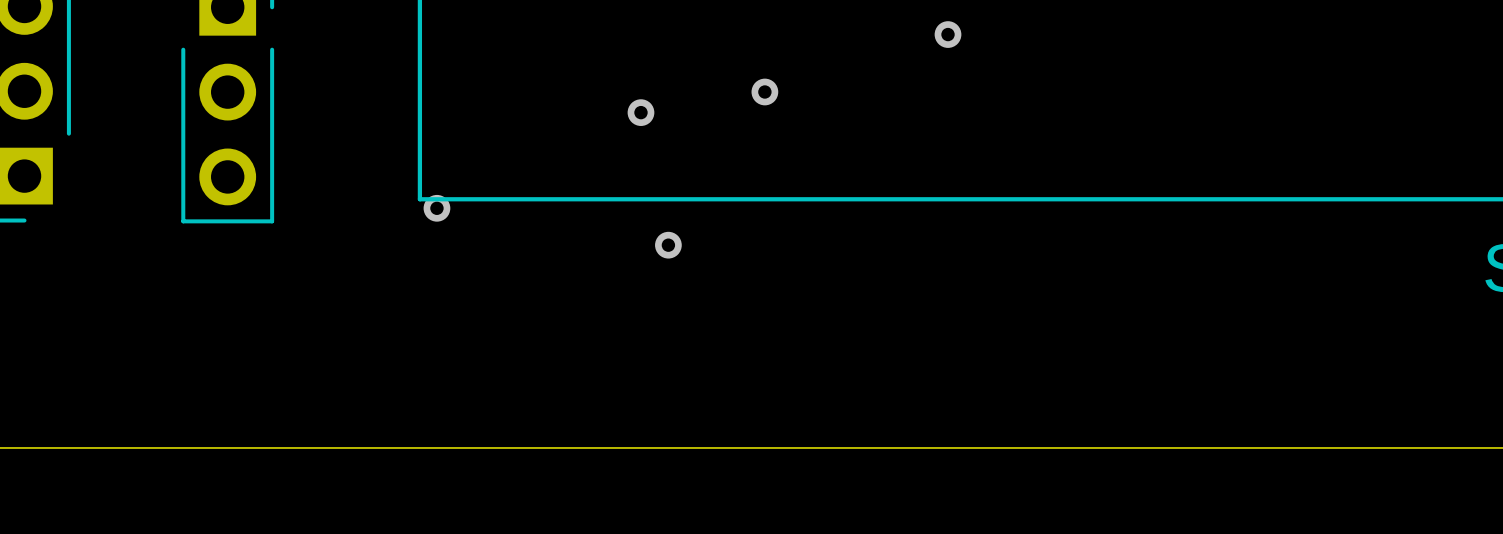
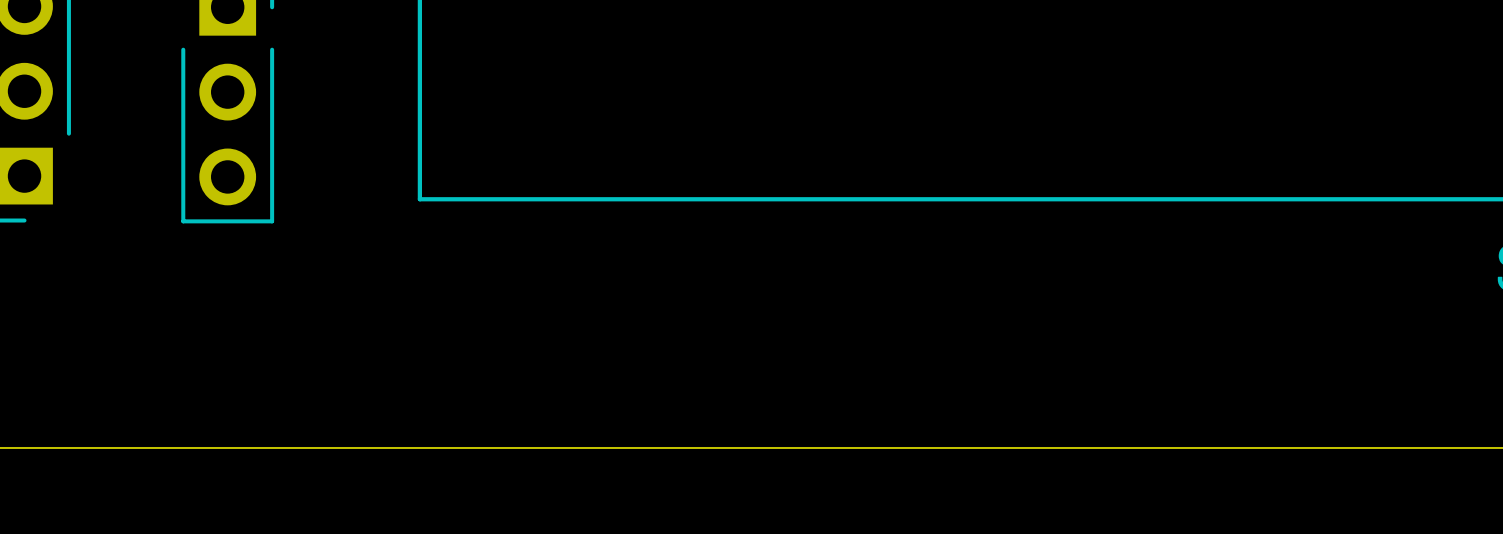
via: (948, 34) -> none
via: (764, 91) -> none
via: (640, 112) -> none
via: (436, 208) -> none
via: (668, 245) -> none

